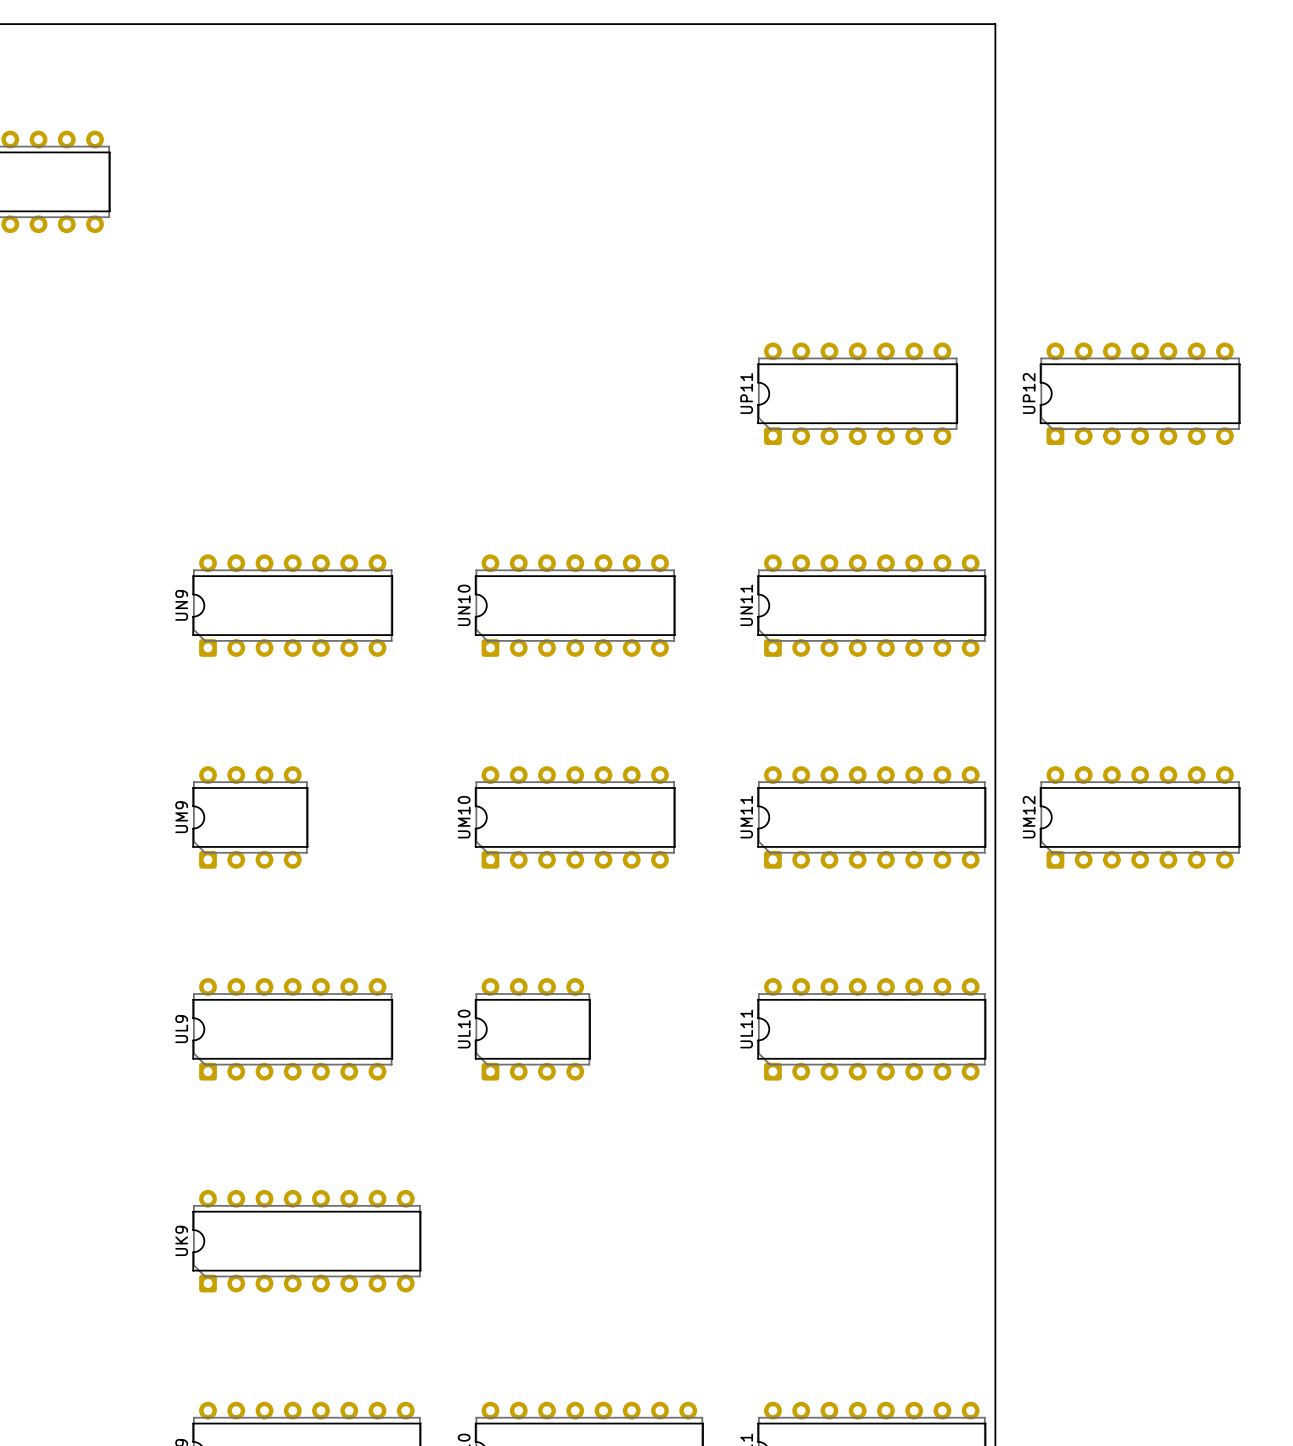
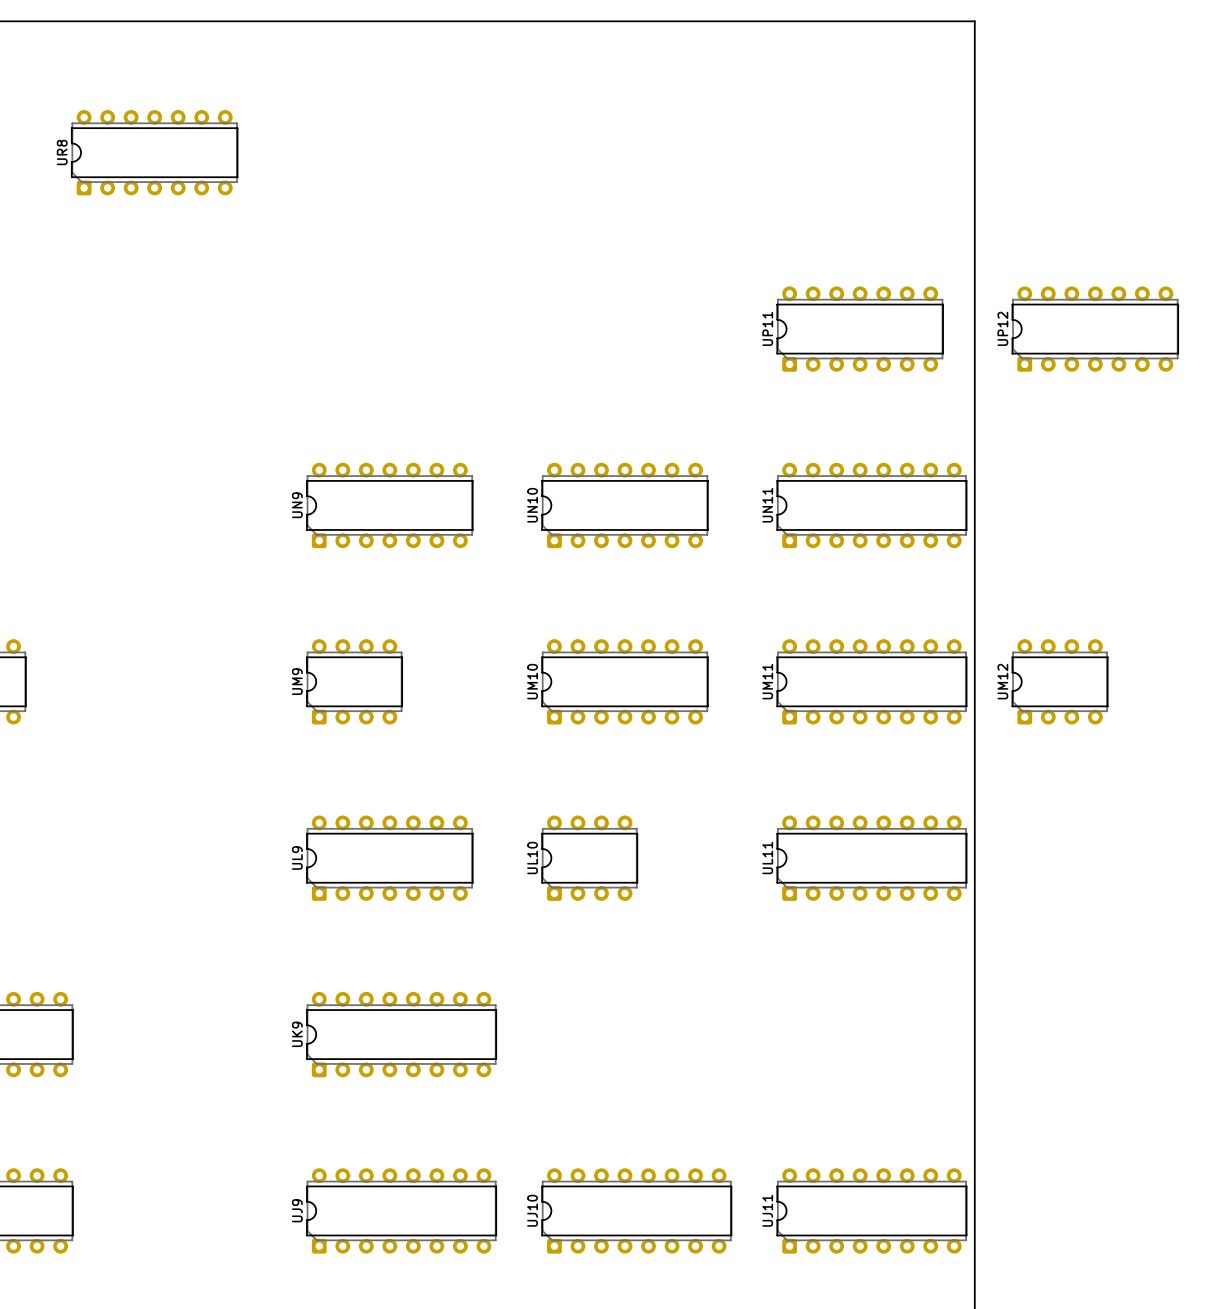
UM12 footprint: [1039, 766, 1241, 869] -> [1011, 639, 1109, 725]

